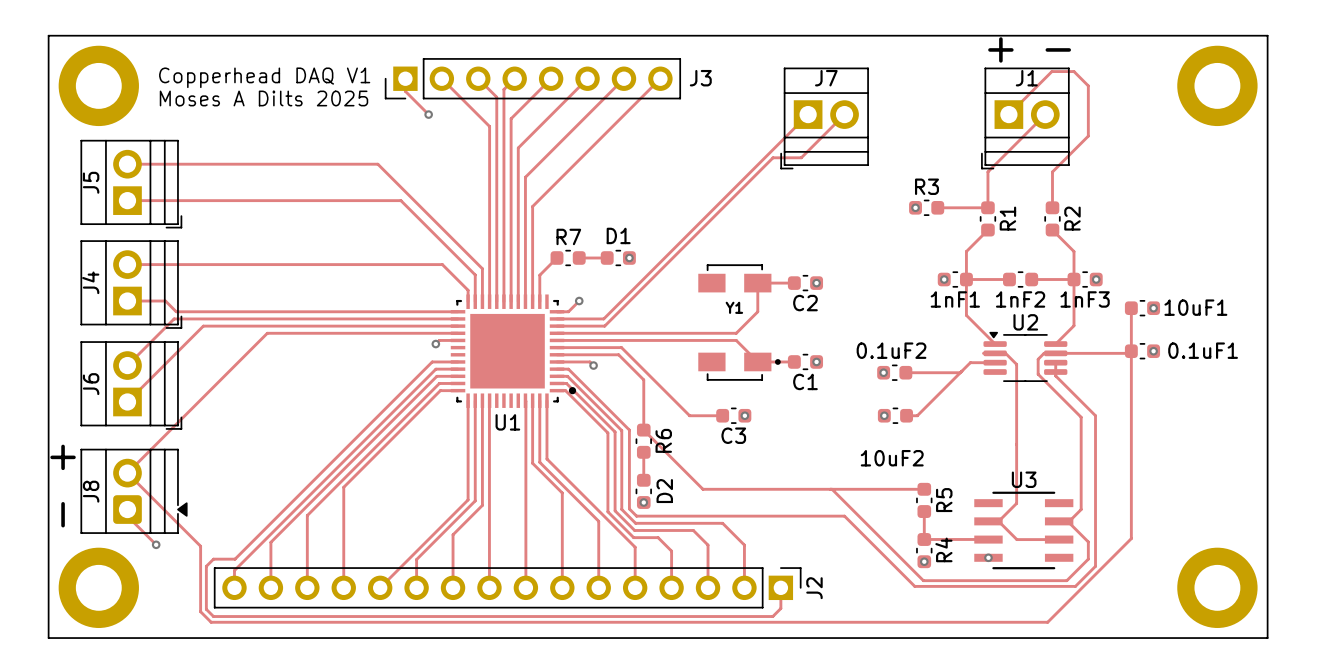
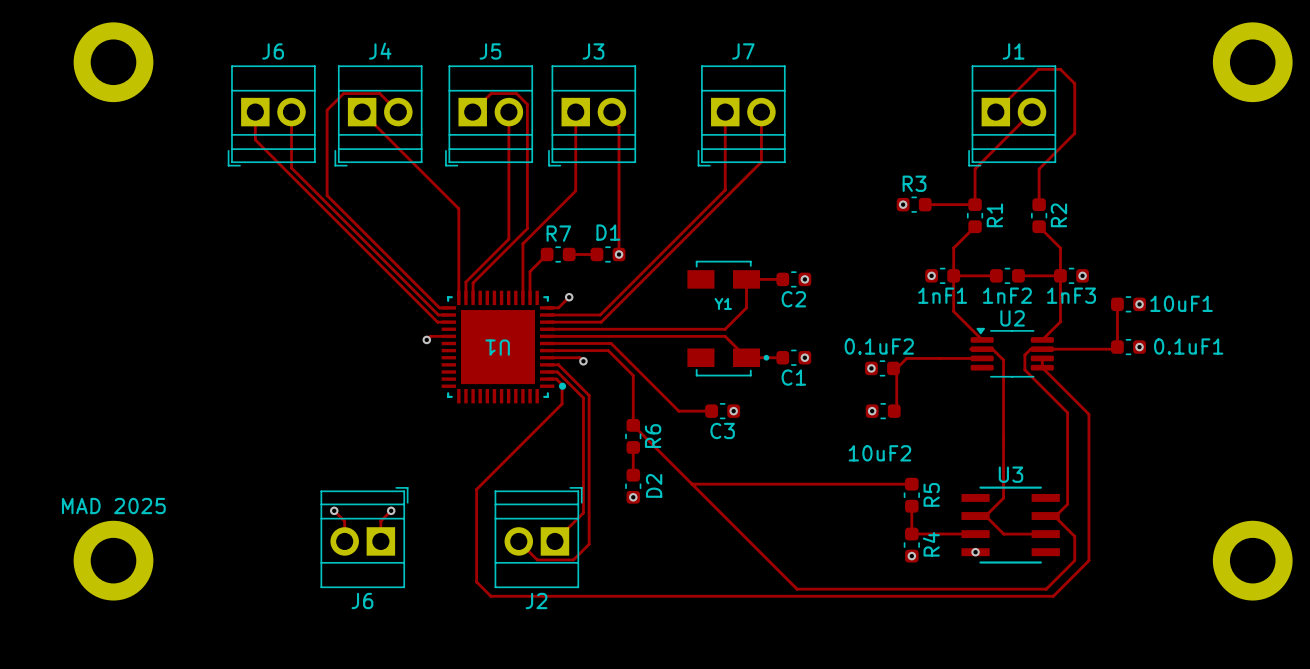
board edge: (48, 35) (1267, 35) (1267, 638) (48, 638) (48, 35) -> none
text: + - (1029, 49) -> none
J3 footprint: [384, 58, 682, 100] -> [548, 65, 637, 167]
text: Copperhead DAQ V1 (264, 77) -> none
track: (405, 78) (405, 91) (428, 114) -> none
track: (441, 78) (489, 126) (489, 301) -> none
track: (478, 78) (496, 97) (496, 301) -> none
track: (514, 78) (503, 89) (503, 301) -> none
track: (551, 78) (511, 118) (511, 301) -> none
track: (587, 78) (518, 148) (518, 301) -> none
track: (623, 78) (525, 177) (525, 301) -> none
track: (660, 78) (532, 206) (532, 247) -> (575, 112) (575, 190) (522, 243)
J3 name position: J3 (700, 78) -> J3 (593, 51)
J7 name position: J7 (826, 78) -> J7 (743, 51)
J1 name position: J1 (1026, 78) -> J1 (1013, 51)
part position: (98, 85) -> (113, 62)
part position: (1217, 85) -> (1252, 62)
text: Moses A Dilts 2025 (263, 98) -> none
via: (428, 114) -> none
track: none -> (611, 112) (611, 119) (619, 126) (619, 254)
track: none -> (725, 112) (725, 189)
track: (808, 114) (603, 318) -> (725, 189) (600, 315) (593, 315)
track: (844, 114) (801, 157) (773, 157) (604, 326) -> (761, 112) (761, 161) (601, 322) (594, 322)
J6: none -> (271, 115)
J7 position: (824, 118) -> (741, 115)
track: (127, 164) (377, 164) (482, 268) (482, 286) -> (472, 112) (491, 93) (516, 93) (527, 104) (527, 228) (473, 282)
J5 rotation: 0° (131, 184) -> 90° clockwise (489, 115)
J5 position: (131, 184) -> (489, 115)
track: (127, 200) (400, 200) (475, 274) (475, 285) -> (508, 112) (508, 239) (465, 282)
track: (127, 264) (442, 264) (468, 290) -> (362, 112) (458, 208) (458, 286)
J4 rotation: 0° (131, 284) -> 90° clockwise (378, 115)
J4 position: (131, 284) -> (378, 115)
track: (127, 301) (165, 301) (176, 311) (448, 311) -> (398, 112) (379, 93) (343, 93) (327, 110) (327, 195) (439, 307)
track: (447, 318) (174, 318) (127, 365) -> (438, 315) (291, 167) (291, 112)
track: (446, 326) (203, 326) (127, 401) -> (437, 322) (255, 139) (255, 112)
track: (458, 333) (267, 333) (127, 473) (200, 546) (200, 611) (211, 622) (1047, 622) (1131, 538) (1131, 351) -> none
track: (458, 361) (432, 361) (235, 559) (213, 559) (206, 566) (206, 609) (213, 616) (772, 616) (780, 608) (780, 587) -> none
track: (970, 362) (917, 415) (906, 415) -> (957, 358) (906, 358) (896, 368) (896, 411)
track: (458, 369) (435, 369) (234, 570) (234, 587) -> none
track: (905, 372) (960, 372) -> none
track: (1055, 372) (1055, 375) (1095, 415) (1095, 566) (1075, 586) (914, 586) (844, 516) (636, 516) (629, 508) (629, 430) (599, 399) -> (1042, 367) (1088, 414) (1088, 560) (1053, 596) (490, 596) (476, 582) (476, 489) (562, 404) (562, 384)
track: (458, 376) (436, 376) (270, 542) (270, 587) -> none
track: (458, 383) (439, 383) (307, 515) (307, 587) -> none
J6: (131, 385) -> none
track: (572, 389) (615, 432) (615, 510) (634, 530) (693, 530) (708, 545) (708, 587) -> none
track: (458, 390) (440, 390) (343, 487) (343, 587) -> none
track: (557, 390) (565, 390) (607, 432) (607, 511) (633, 537) (658, 537) (671, 551) (671, 587) -> none
track: none -> (589, 395) (589, 544) (573, 559) (537, 559) (518, 541)
track: (468, 400) (468, 499) (380, 587) -> none
track: (475, 400) (475, 500) (416, 559) (416, 587) -> none
track: (482, 400) (482, 505) (453, 534) (453, 587) -> none
track: (489, 400) (489, 587) -> none
track: (525, 400) (525, 587) -> none
track: (532, 400) (532, 463) (562, 493) (562, 587) -> none
track: (539, 400) (539, 462) (598, 521) (598, 587) -> none
track: (546, 400) (546, 459) (635, 547) (635, 587) -> none
track: (593, 402) (621, 430) (621, 509) (635, 523) (722, 523) (744, 545) (744, 587) -> (583, 397) (583, 512) (554, 541)
U1 name rotation: 0° (507, 422) -> 180° (497, 347)
U1 name position: U1 (507, 422) -> U1 (497, 347)
text: + - (63, 486) -> none
track: (832, 489) (923, 580) (1066, 580) (1088, 559) -> (692, 484) (797, 589) (1046, 589) (1074, 560) (1074, 553)
J8: (134, 491) -> none
track: (127, 509) (127, 516) (156, 544) -> none
track: none -> (334, 510) (344, 521) (344, 541)
via: none -> (334, 510)
track: none -> (391, 510) (380, 521) (380, 541)
via: none -> (391, 510)
J6: none -> (364, 537)
via: (156, 544) -> none
MAD 2025: none -> (113, 560)
J2 footprint: [213, 567, 802, 609] -> [494, 487, 583, 589]
part: (98, 587) -> none
part position: (1217, 587) -> (1252, 560)
J2 name position: J2 (814, 588) -> J2 (536, 601)

